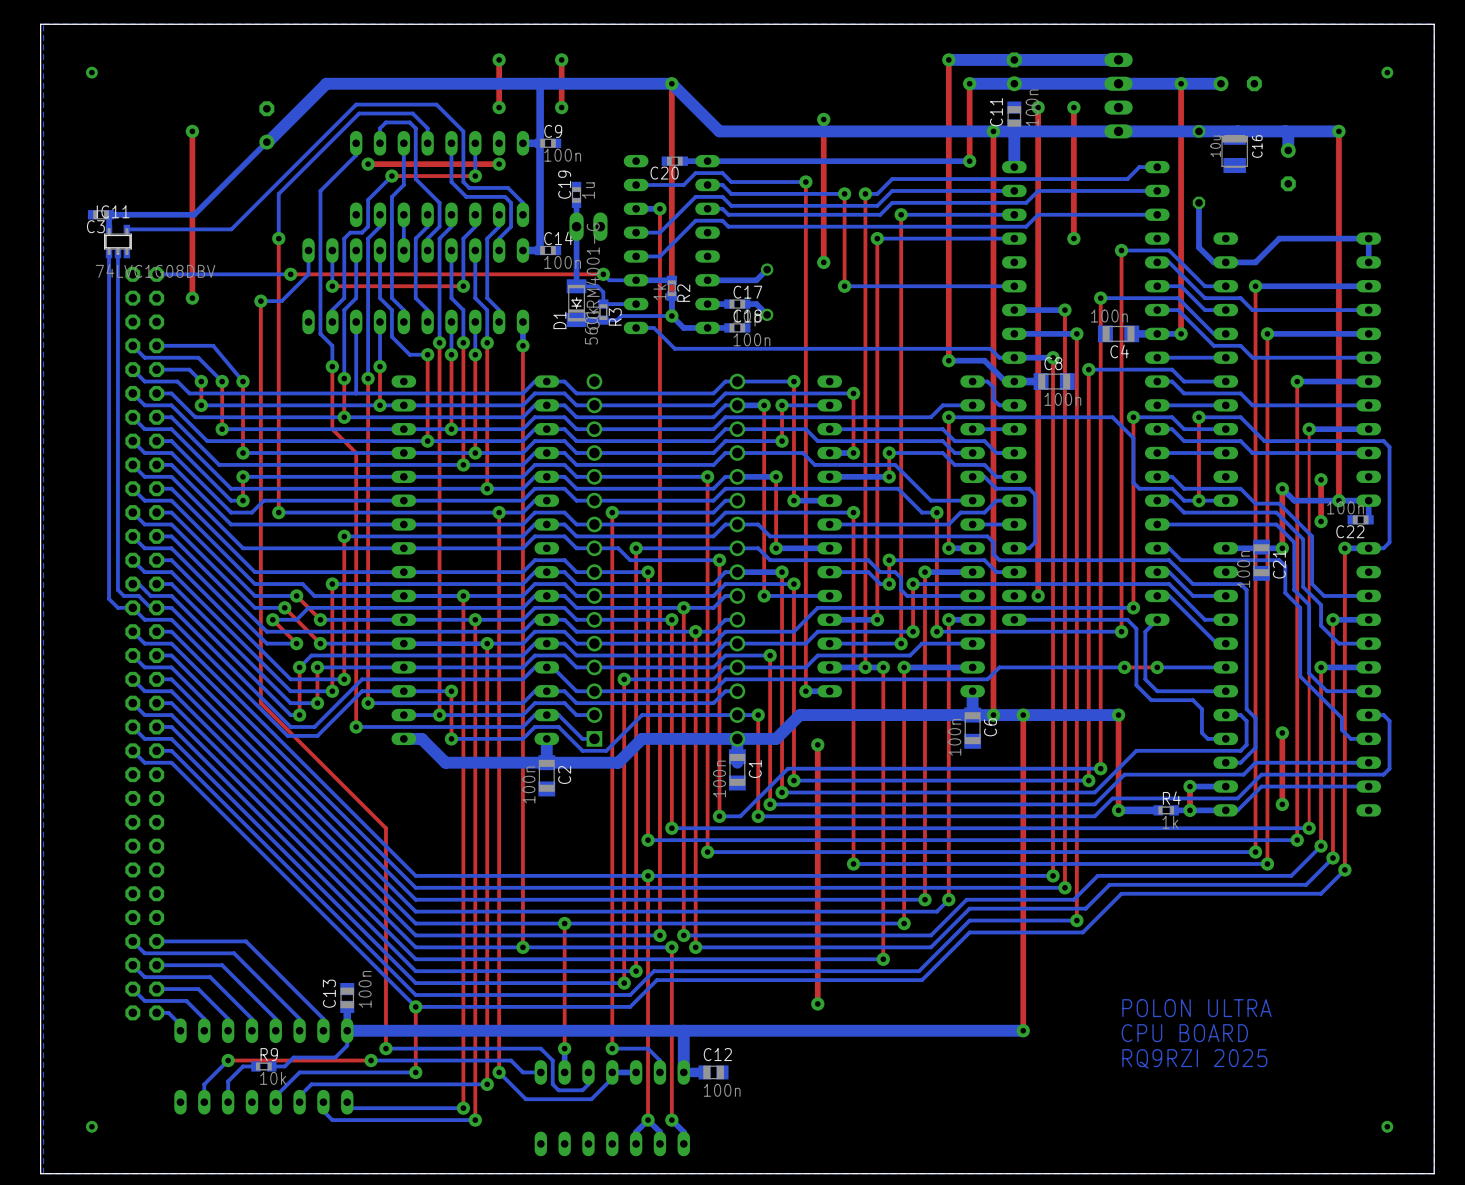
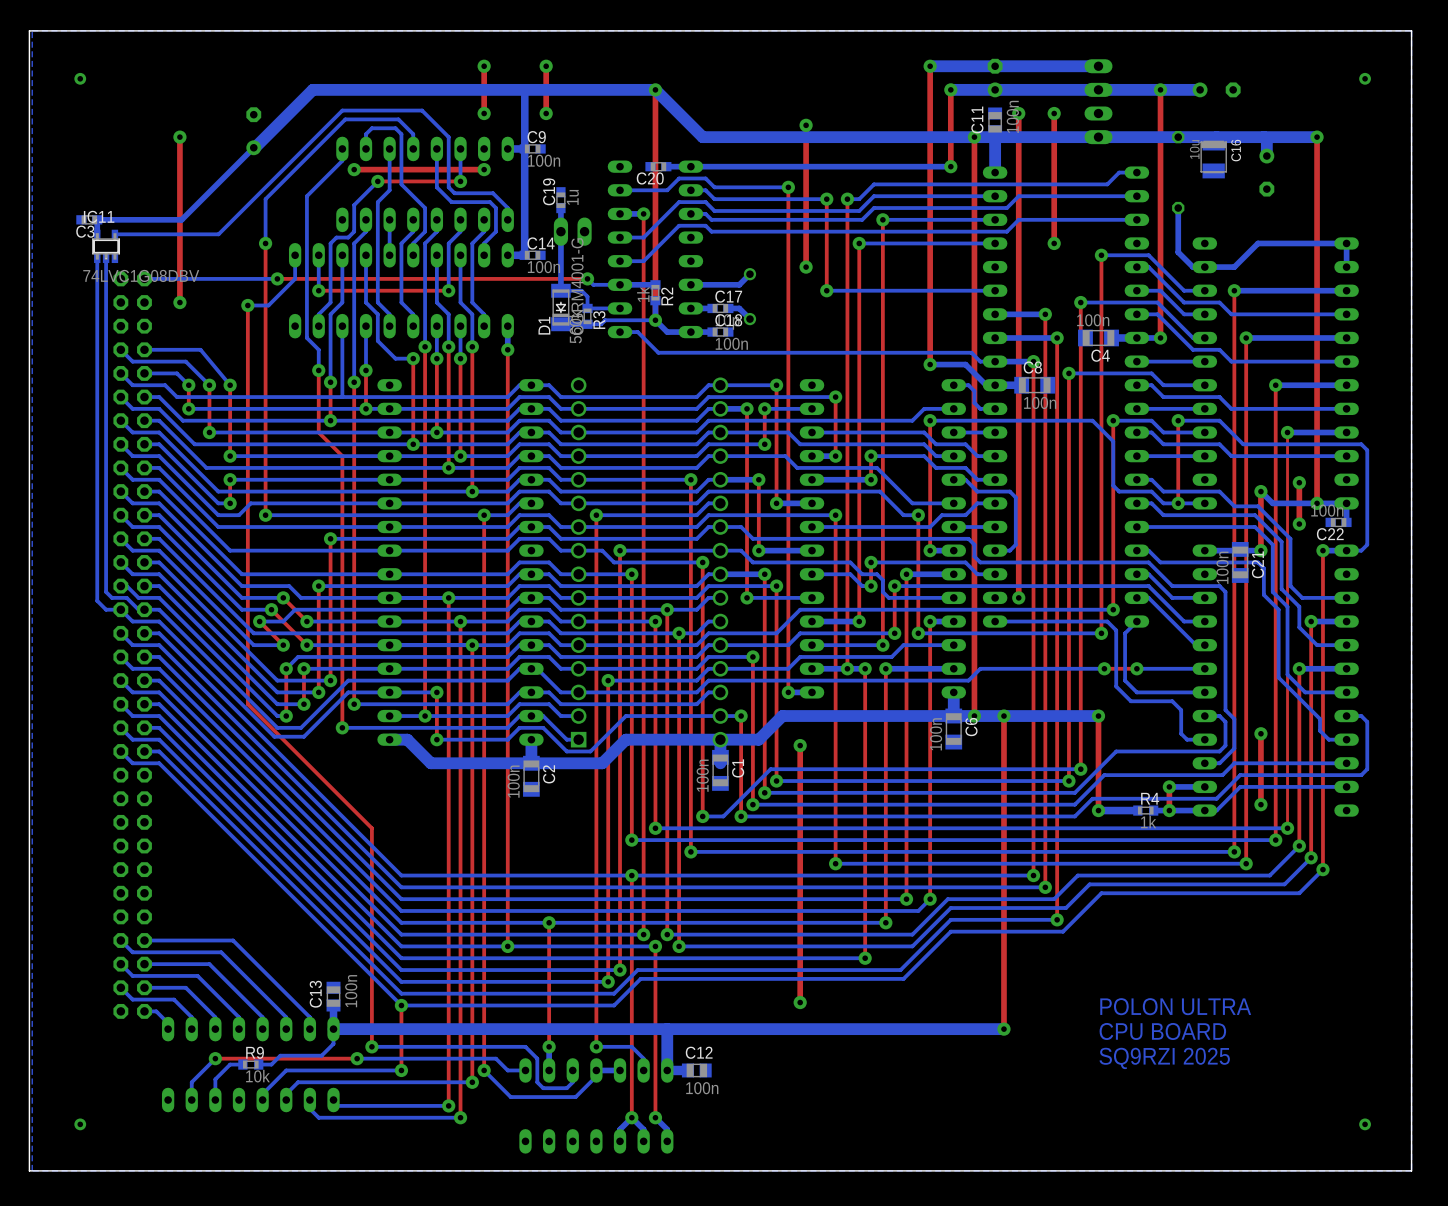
text: RQ9RZI 2025 (1194, 1058) -> SQ9RZI 2025 (1164, 1058)

